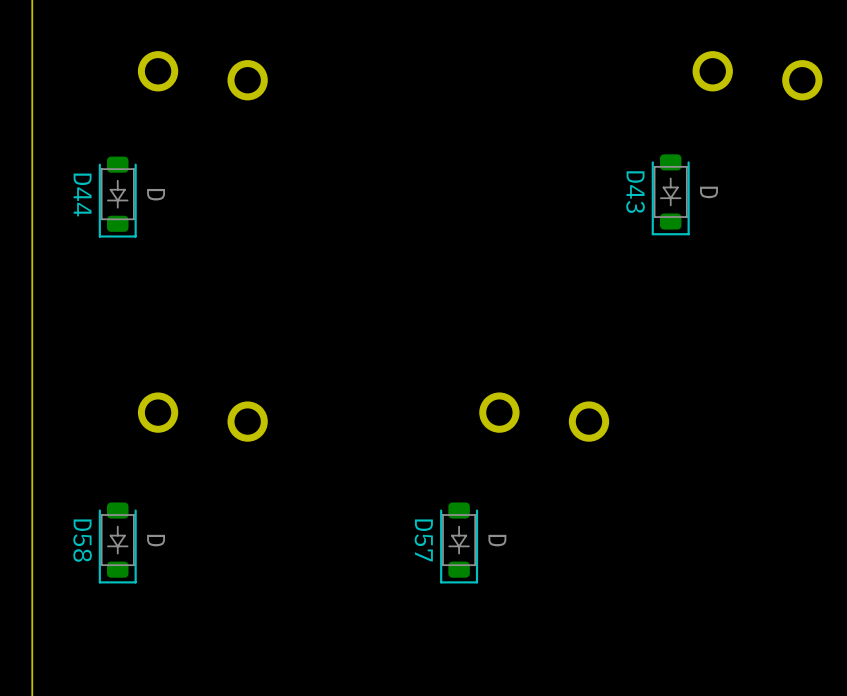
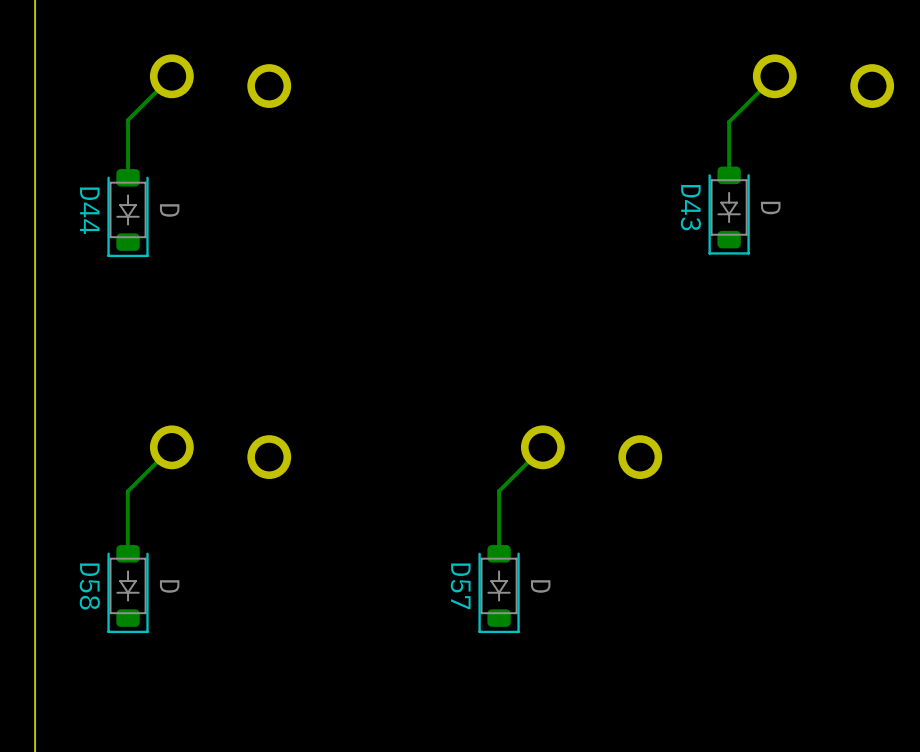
track: none -> (171, 76) (128, 120) (128, 177)
track: none -> (774, 76) (729, 121) (729, 175)
track: none -> (171, 447) (127, 491) (127, 553)
track: none -> (542, 447) (499, 491) (499, 553)

